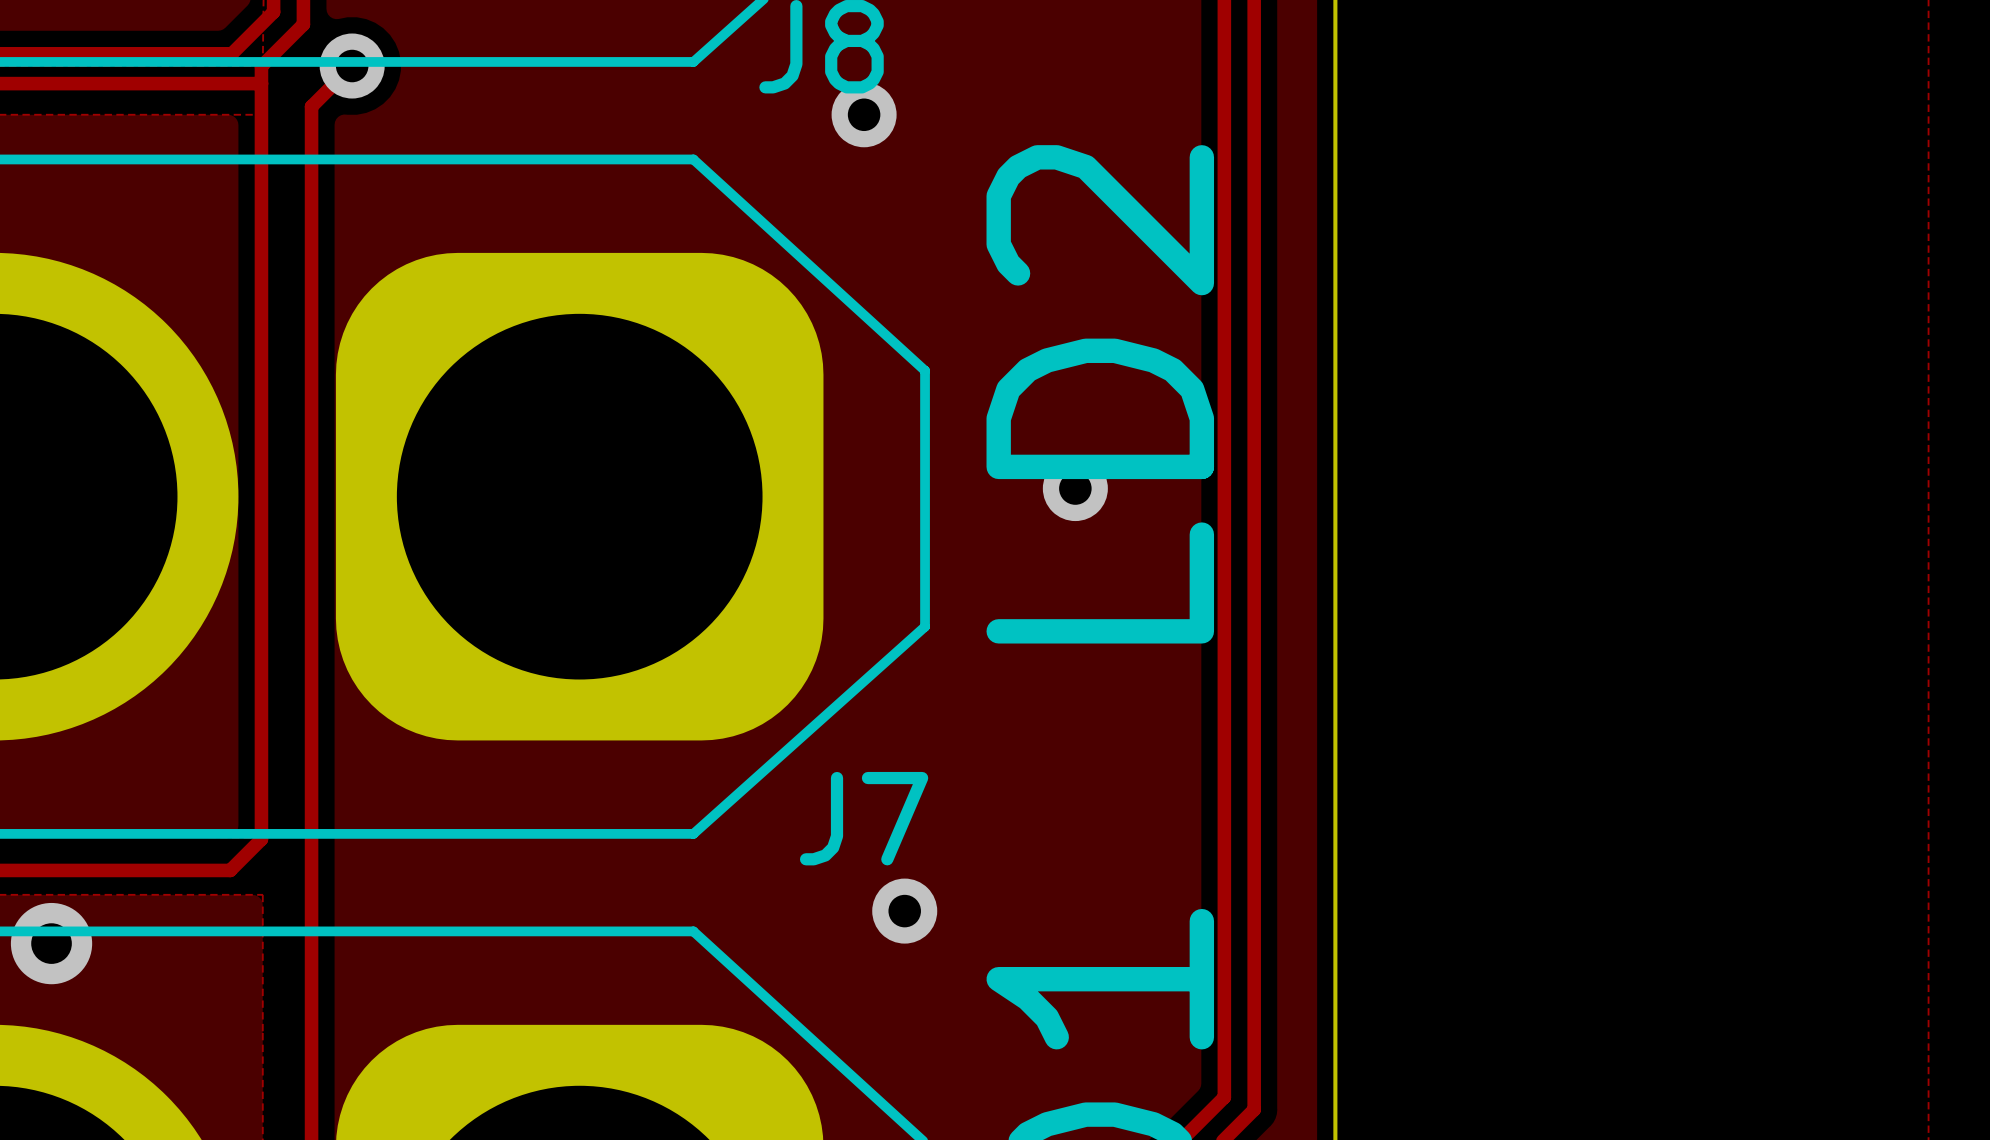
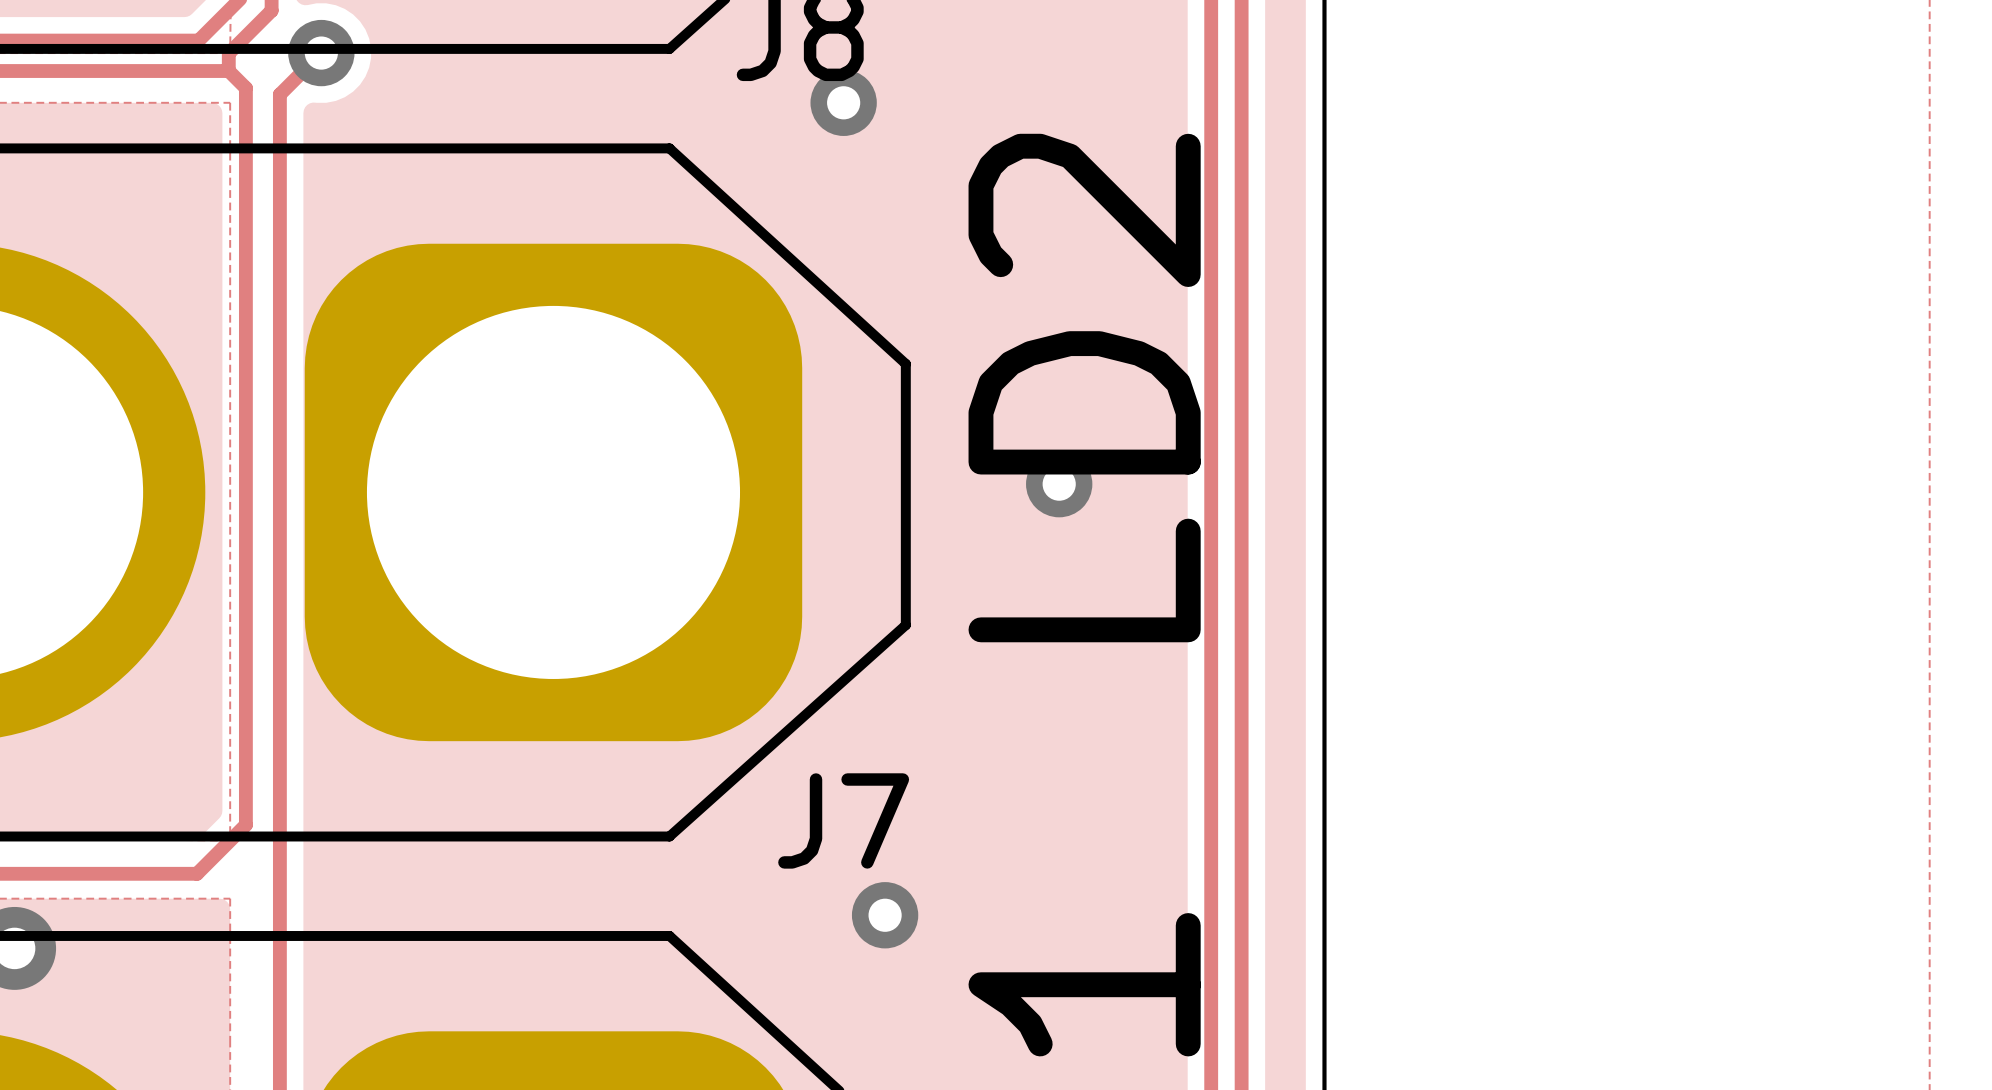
track: (261, 83) (261, 839) -> (228, 71) (245, 88) (245, 824) (228, 842)

